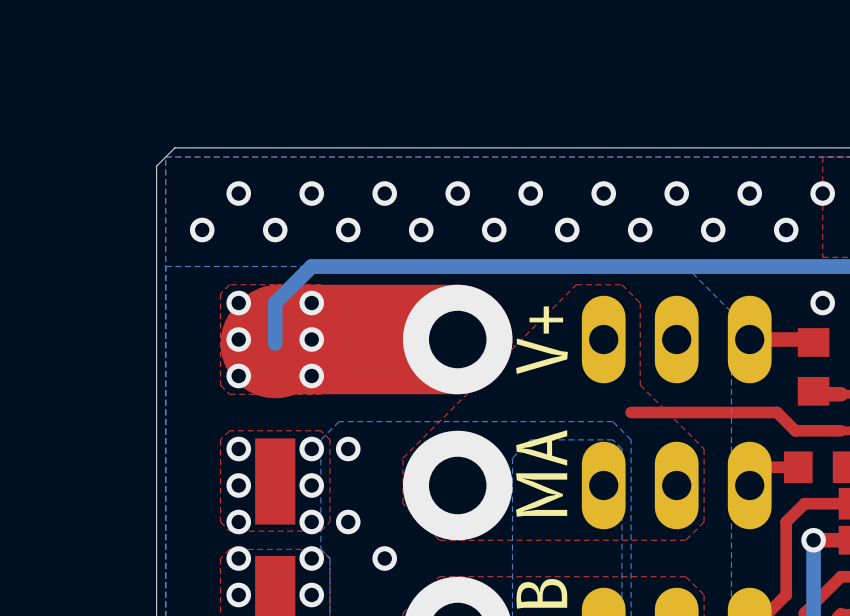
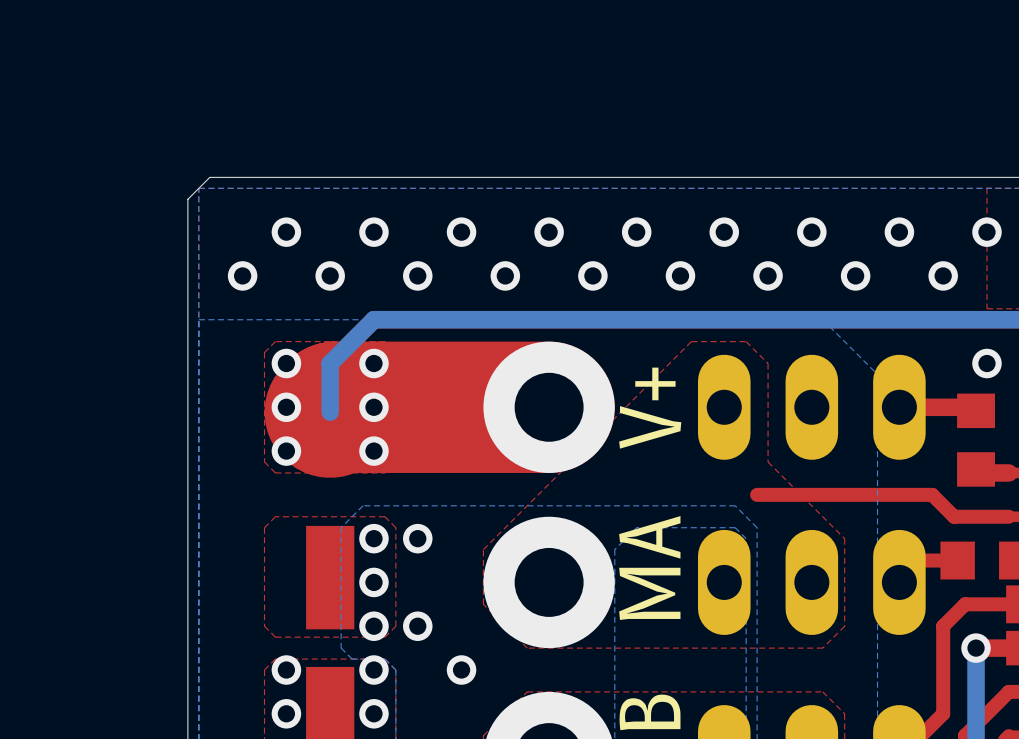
bottom zone outline: (339, 421) (320, 439) (320, 549) -> (406, 505) (363, 505) (341, 527) (341, 648) (352, 659) (384, 659)
via: (238, 449) -> none
via: (238, 485) -> none
via: (238, 521) -> none

